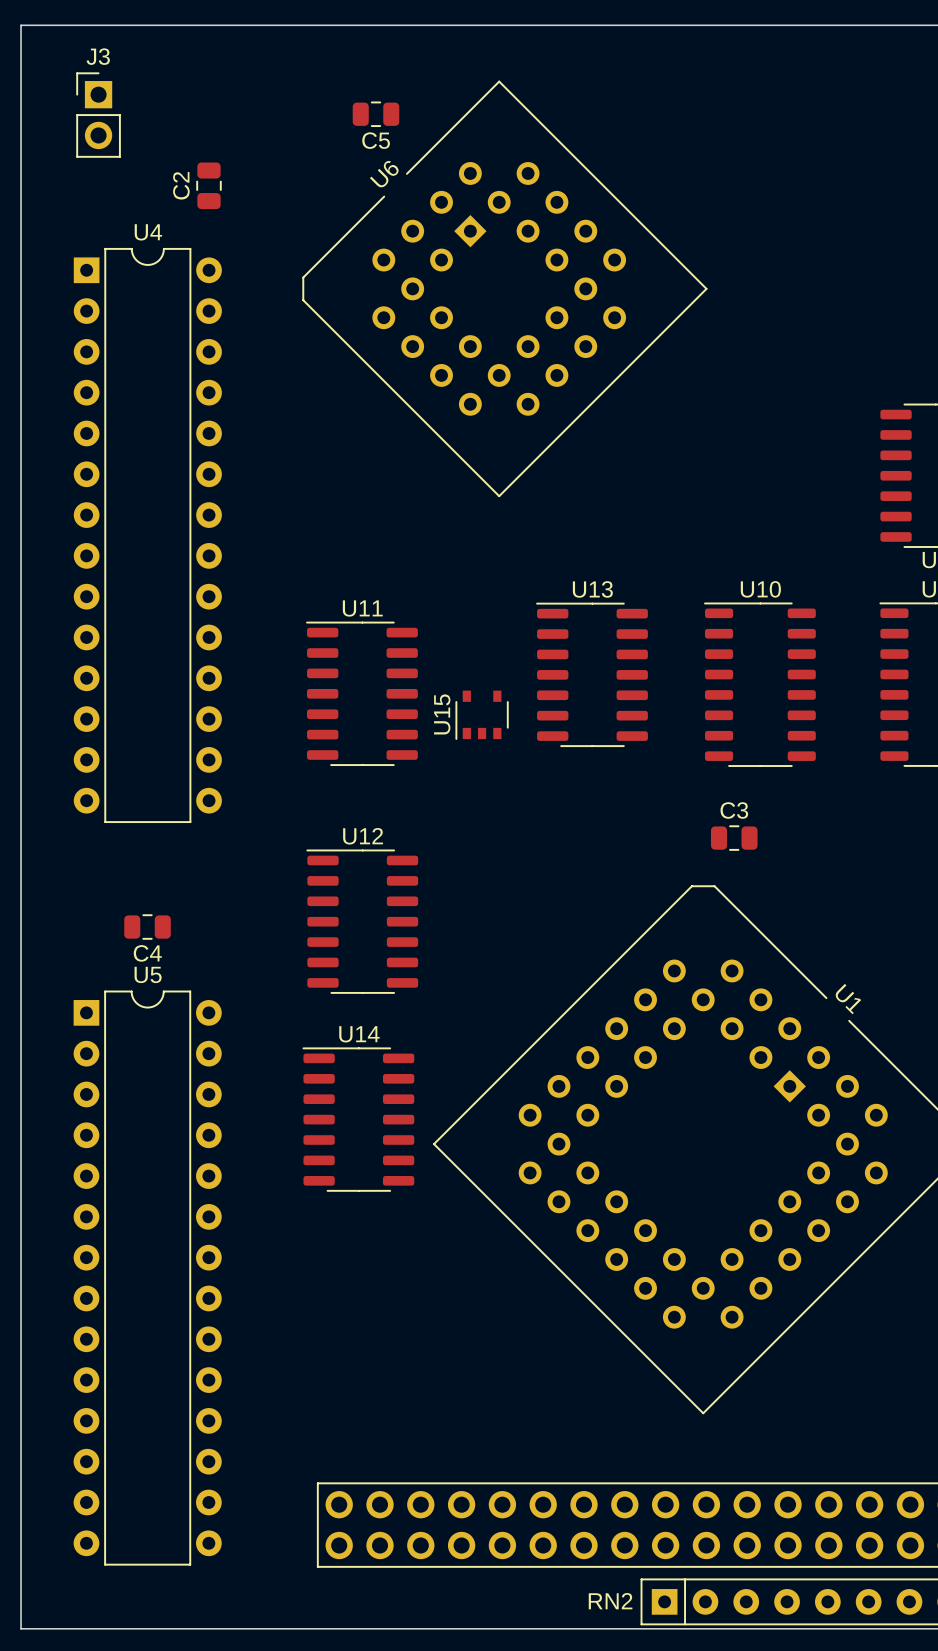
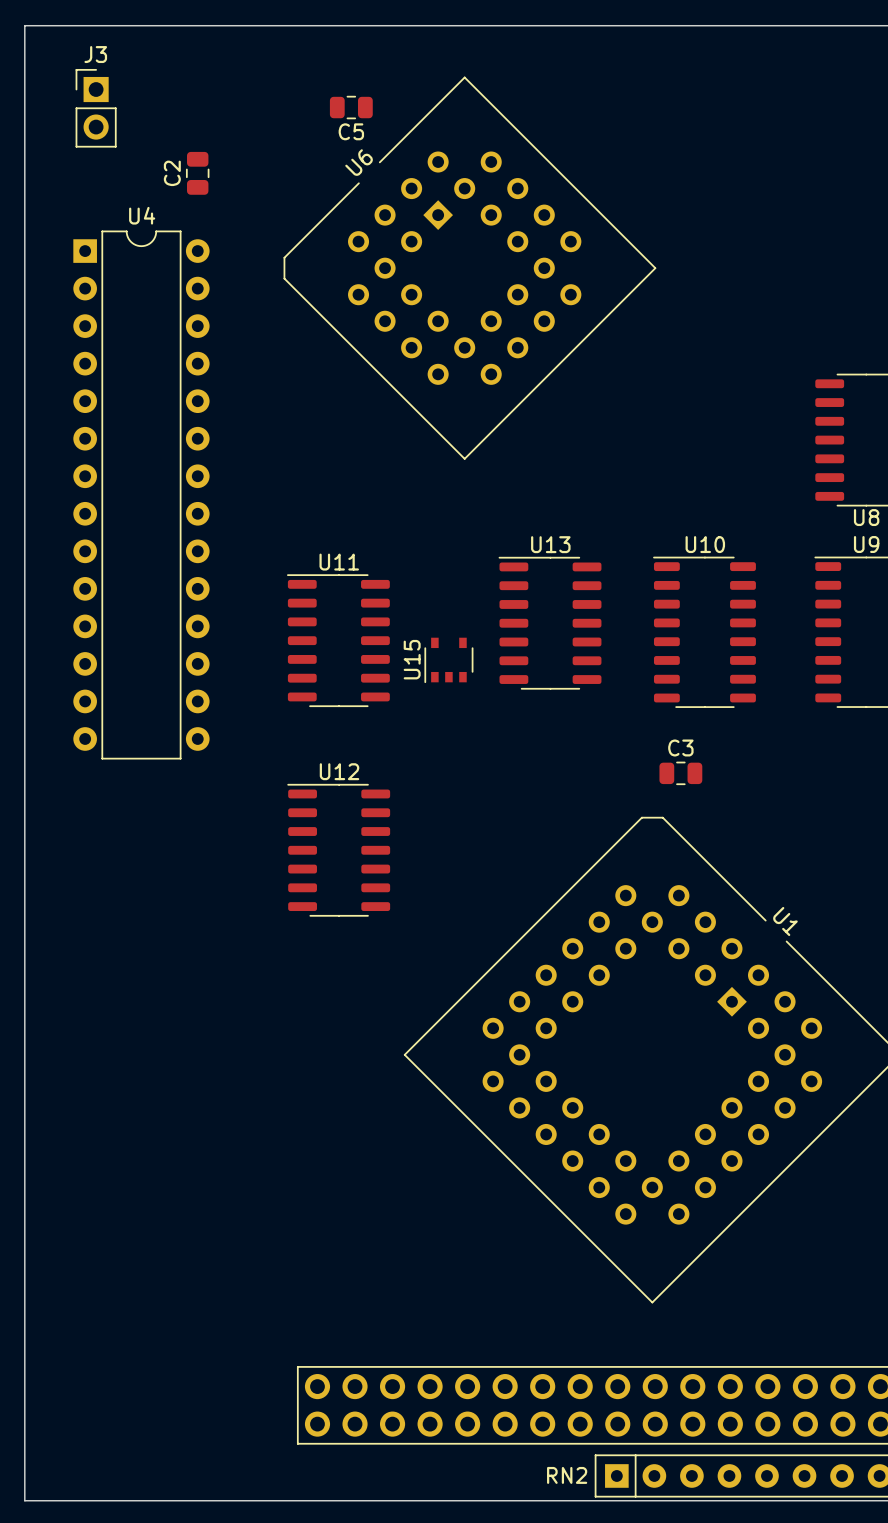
C4: (147, 927) -> none
U14: (358, 1119) -> none
U5: (147, 1278) -> none

